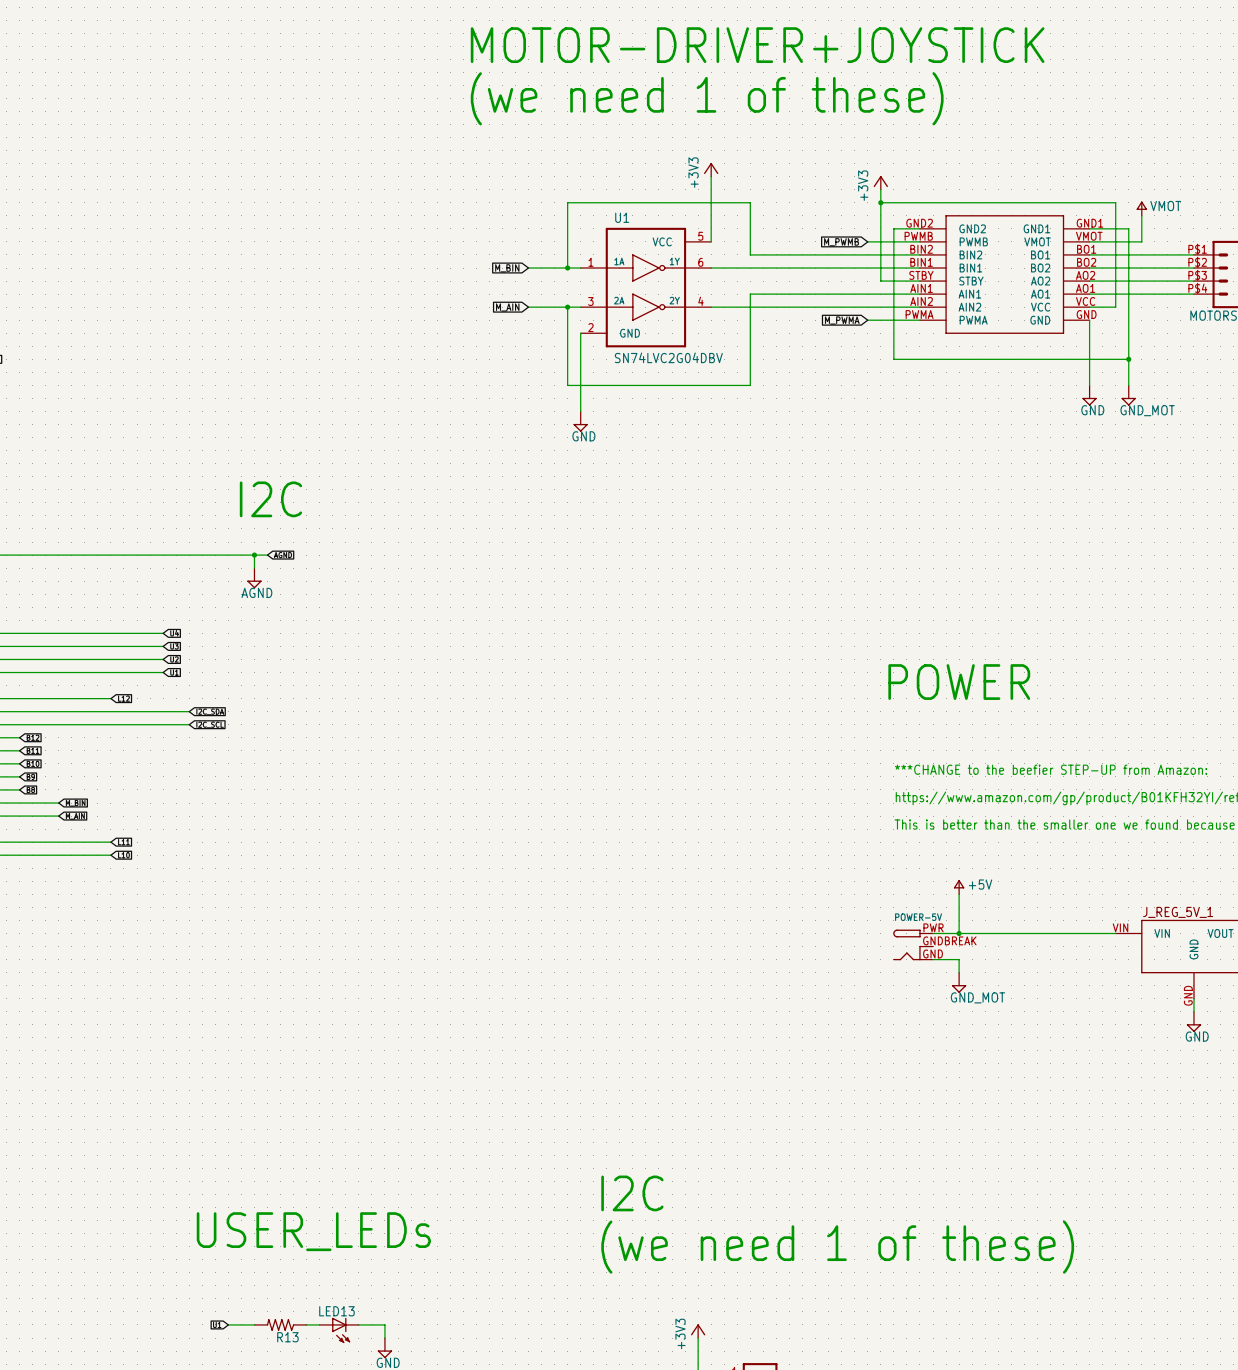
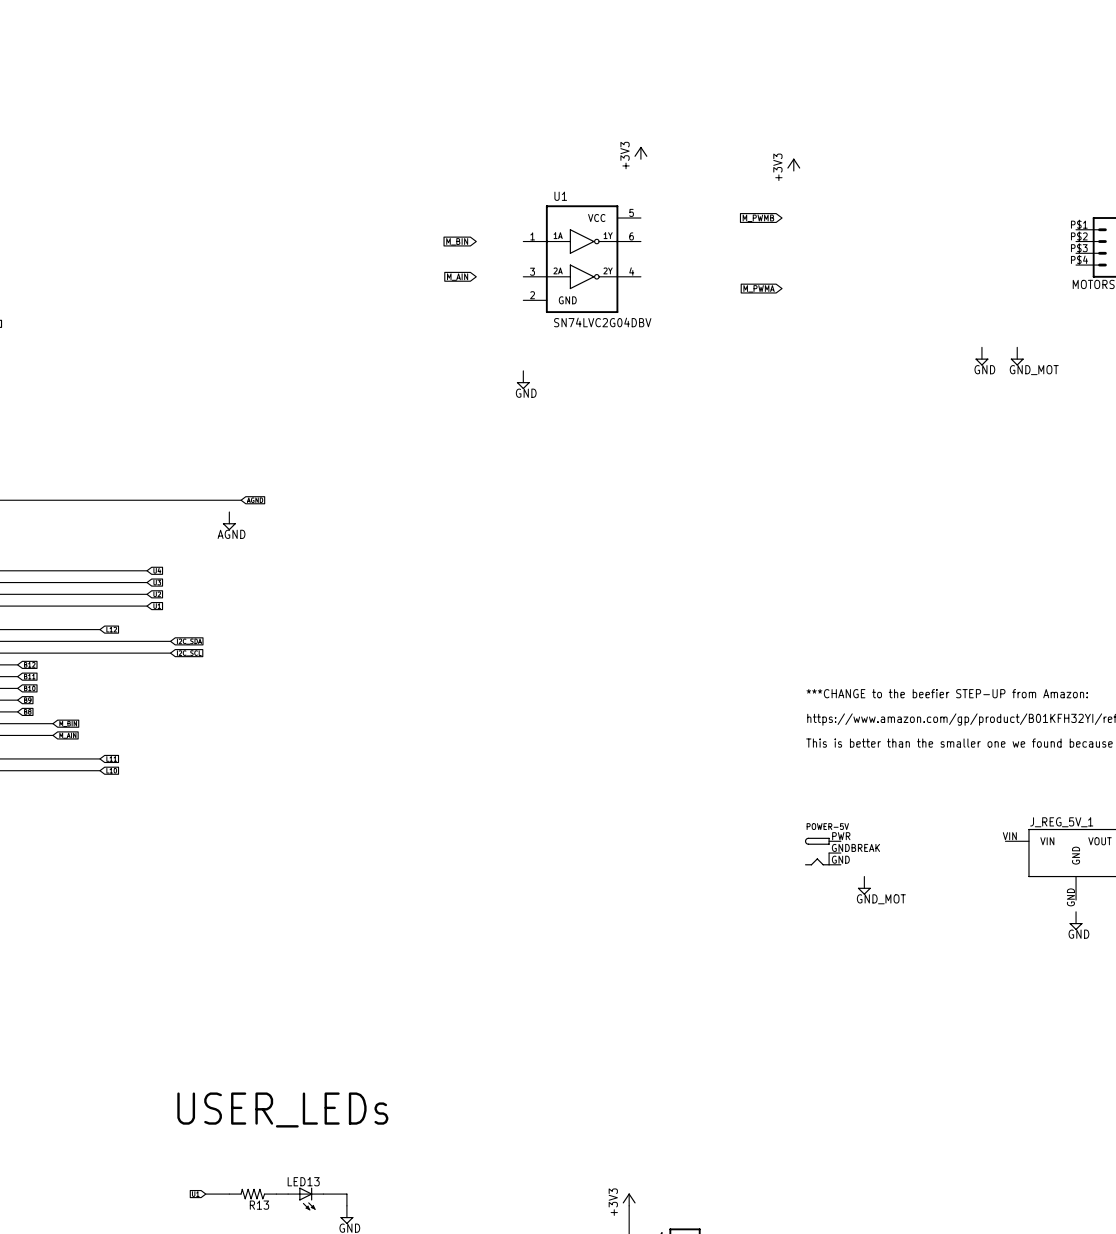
text: MOTOR-DRIVER+JOYSTICK (757, 45) -> none
text: (we need 1 of these) (707, 98) -> none
wire: (711, 176) (711, 241) -> none
wire: (880, 189) (880, 281) (919, 281) -> none
wire: (880, 202) (1115, 202) (1115, 307) (1089, 307) -> none
junction: (880, 202) -> none
power symbol: (1141, 208) -> none
wire: (1141, 215) (1141, 241) (1089, 241) -> none
wire: (919, 228) (893, 228) (893, 359) (1128, 359) -> none
wire: (1089, 228) (1128, 228) (1128, 385) -> none
wire: (867, 241) (919, 241) -> none
wire: (919, 254) (750, 254) (750, 202) (567, 202) (567, 268) -> none
wire: (1089, 254) (1193, 254) -> none
wire: (528, 268) (580, 268) -> none
junction: (567, 268) -> none
wire: (711, 268) (919, 268) -> none
wire: (1089, 268) (1193, 268) -> none
part: (1004, 274) -> none
wire: (1089, 281) (1193, 281) -> none
wire: (919, 294) (750, 294) (750, 385) (567, 385) (567, 307) -> none
wire: (1089, 294) (1193, 294) -> none
wire: (528, 307) (580, 307) -> none
junction: (567, 307) -> none
wire: (711, 307) (919, 307) -> none
wire: (867, 320) (919, 320) -> none
wire: (1089, 320) (1089, 385) -> none
wire: (580, 333) (580, 411) -> none
junction: (1128, 359) -> none
text: I2C (270, 499) -> none
wire: (254, 555) (254, 568) -> none
junction: (254, 555) -> none
text: POWER (959, 682) -> none
power symbol: (959, 887) -> none
wire: (959, 894) (959, 933) -> none
wire: (933, 933) (1115, 933) -> none
junction: (959, 933) -> none
wire: (933, 959) (959, 959) (959, 972) -> none
wire: (1193, 998) (1193, 1011) -> none
text: I2C (632, 1193) -> none
text: (we need 1 of these) (837, 1247) -> none

